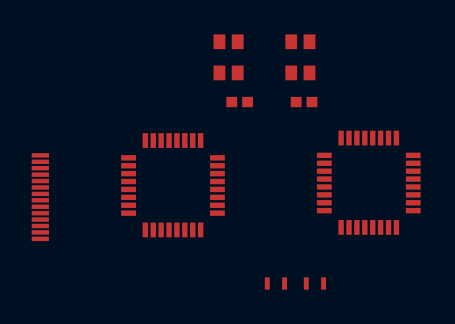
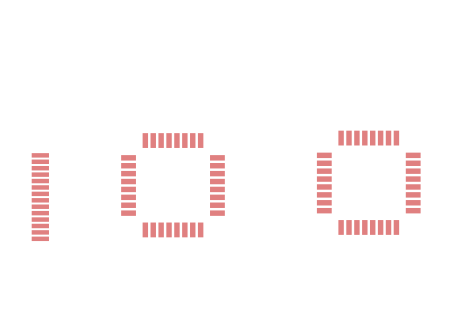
part: (228, 41) -> none
part: (300, 41) -> none
part: (228, 72) -> none
part: (300, 72) -> none
part: (239, 102) -> none
part: (304, 102) -> none
part: (275, 283) -> none
part: (314, 283) -> none

